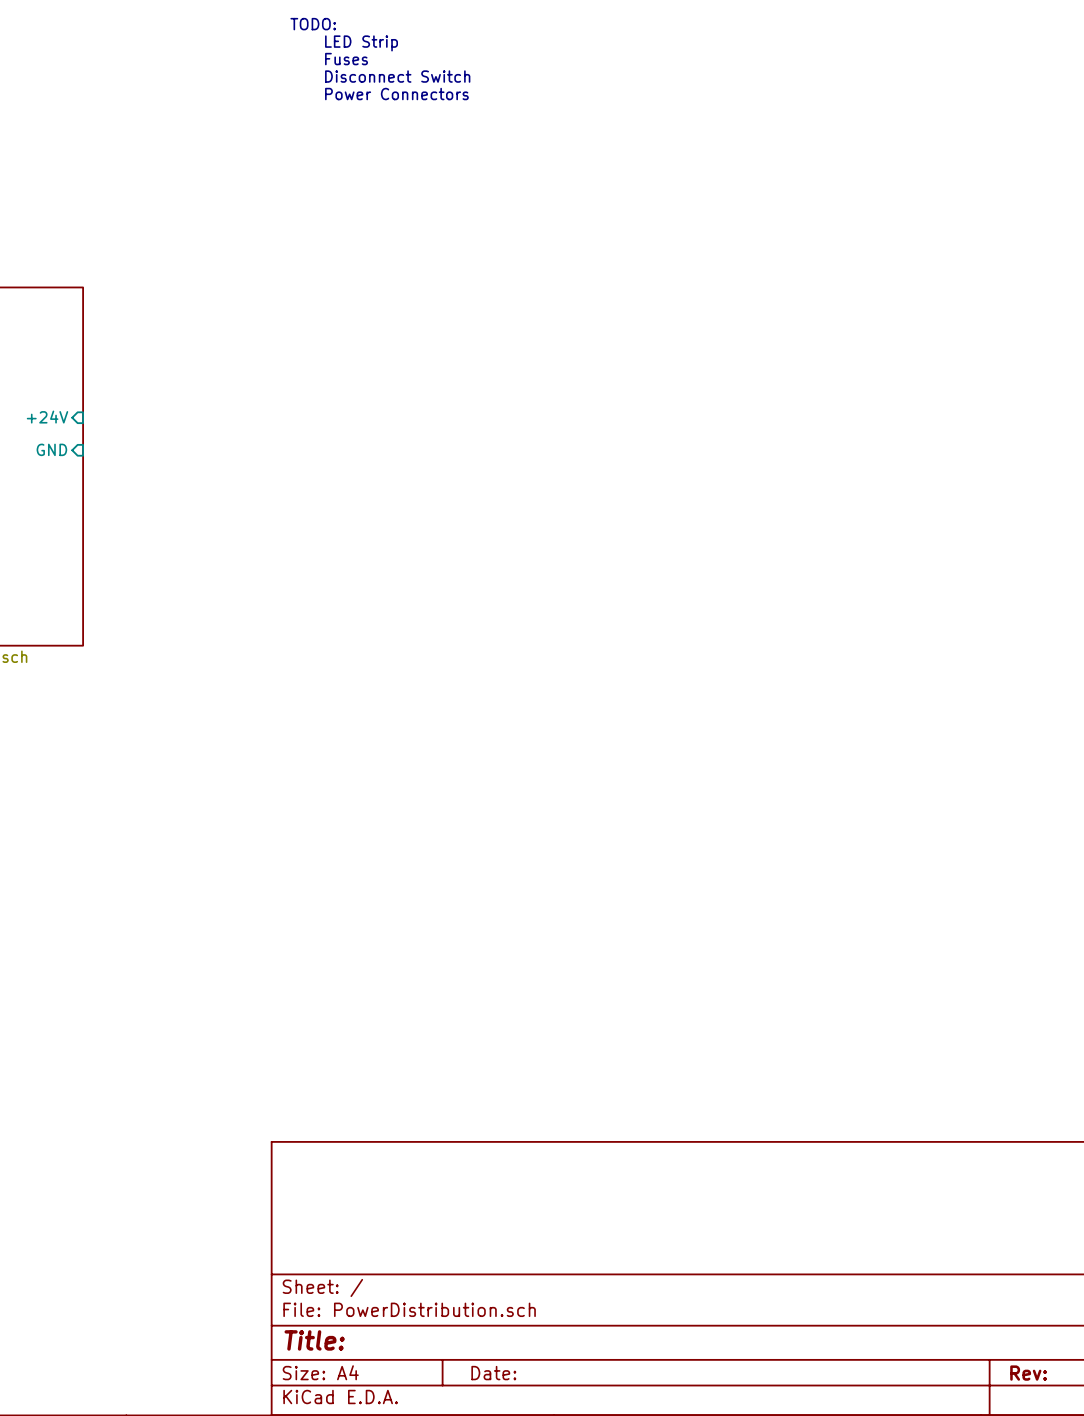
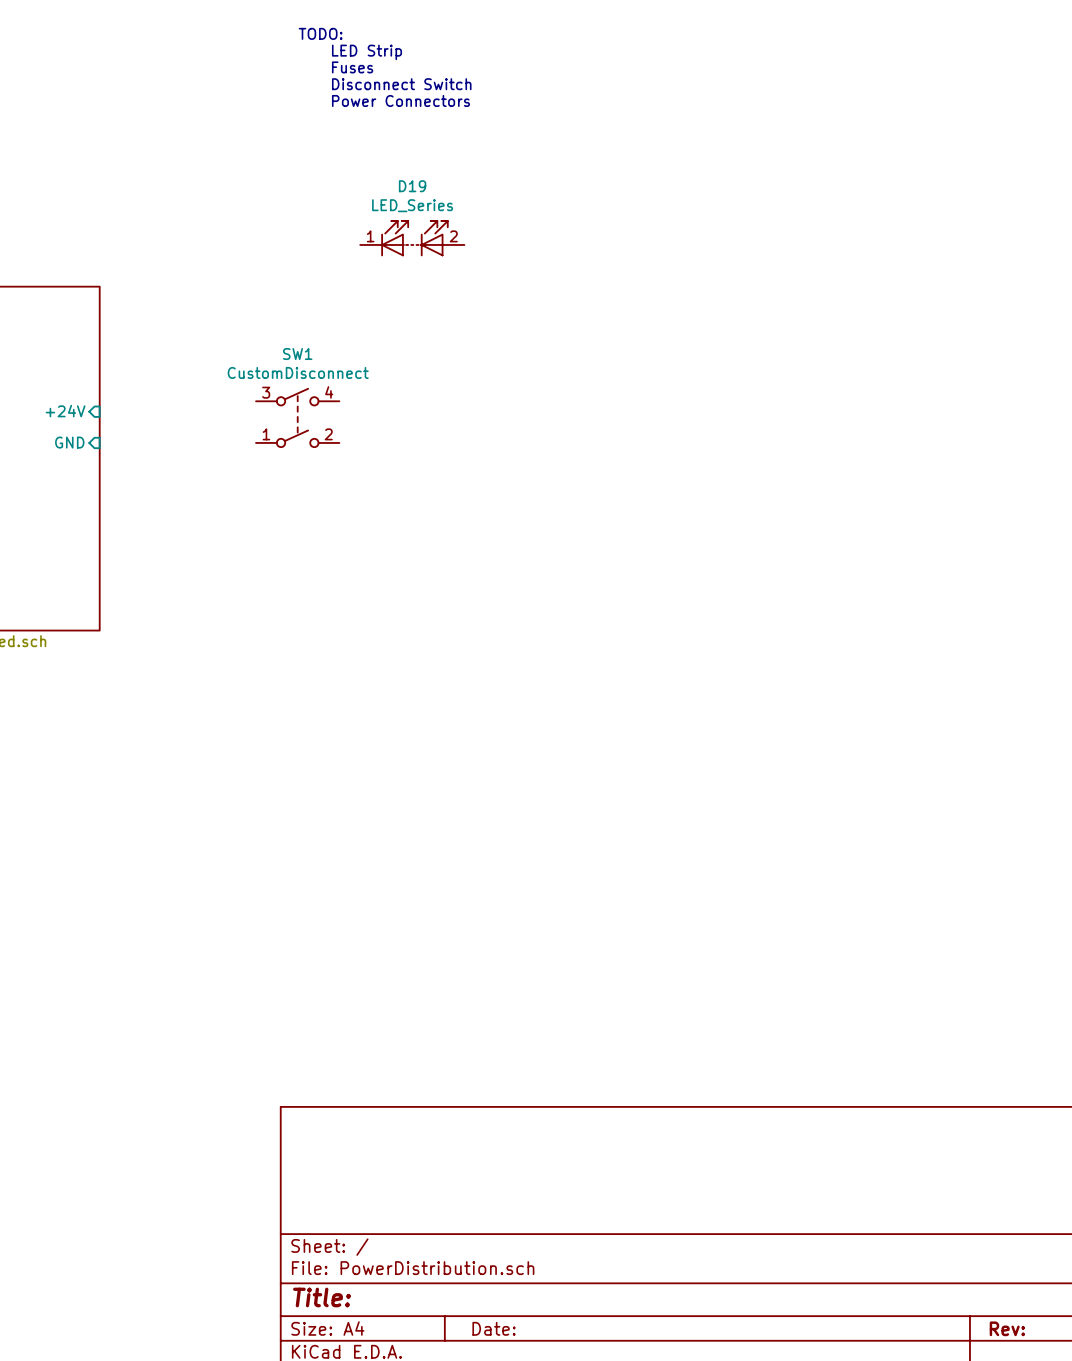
D19: none -> LED_Series (412, 238)
SW1: none -> CustomDisconnect (297, 417)

